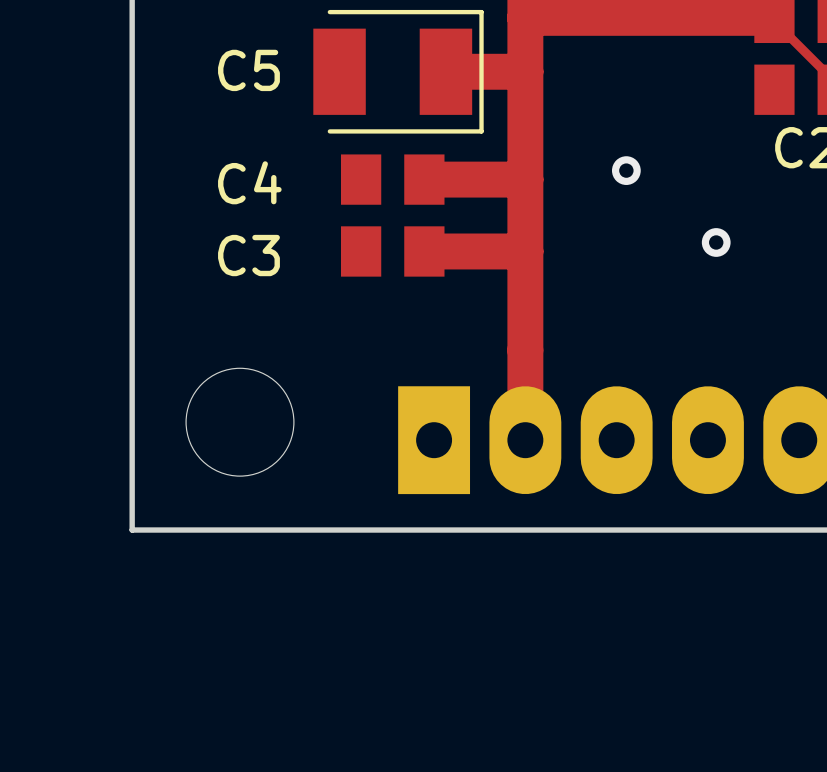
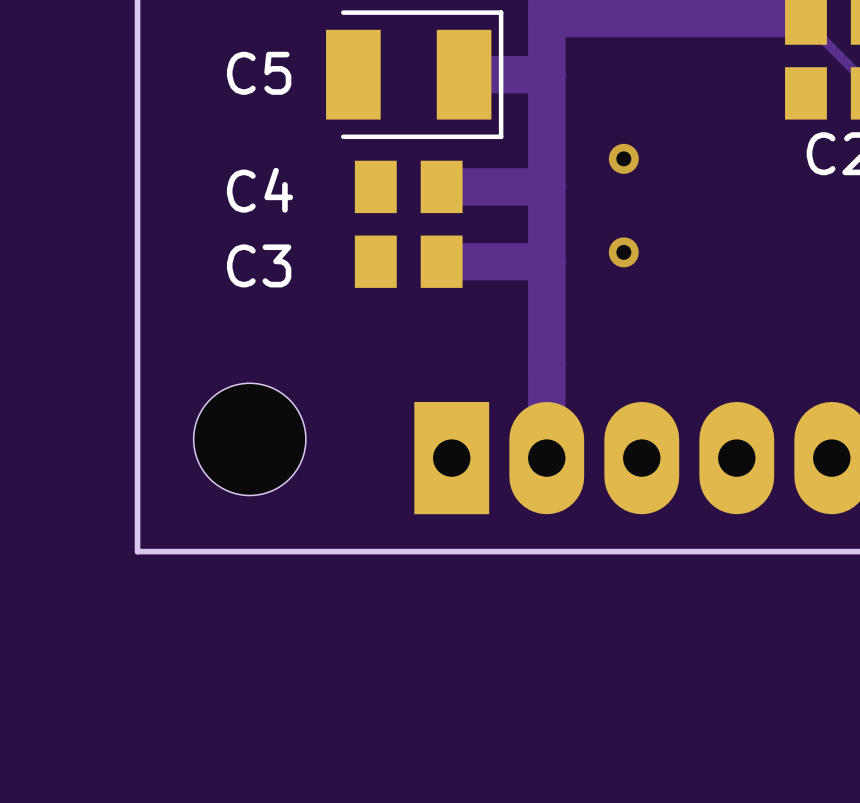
via position: (626, 170) -> (623, 158)
via: none -> (623, 252)
via: (716, 242) -> none

